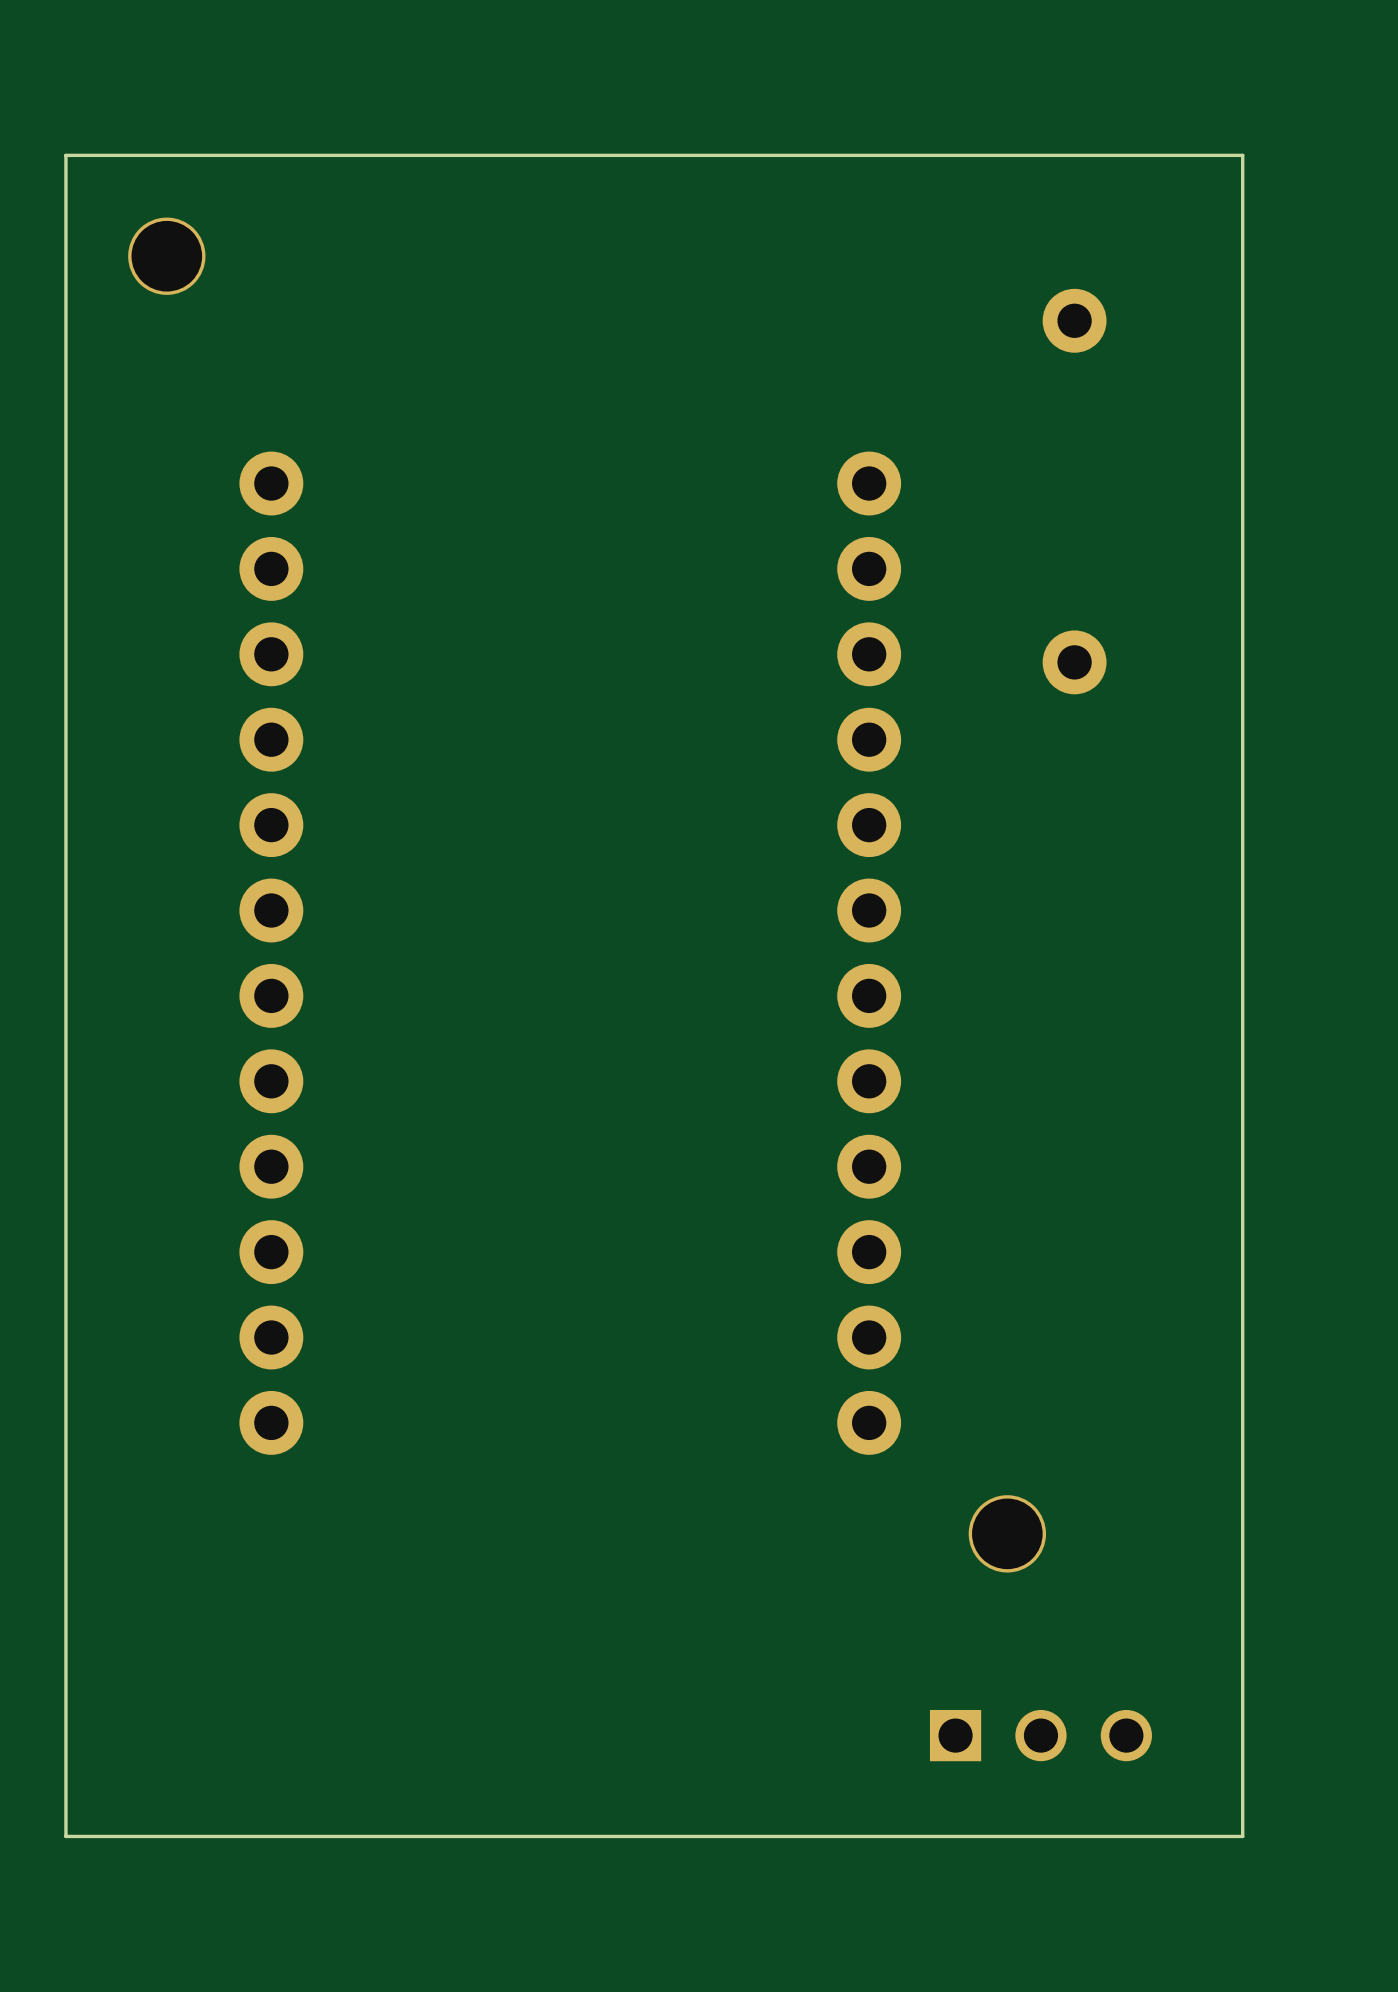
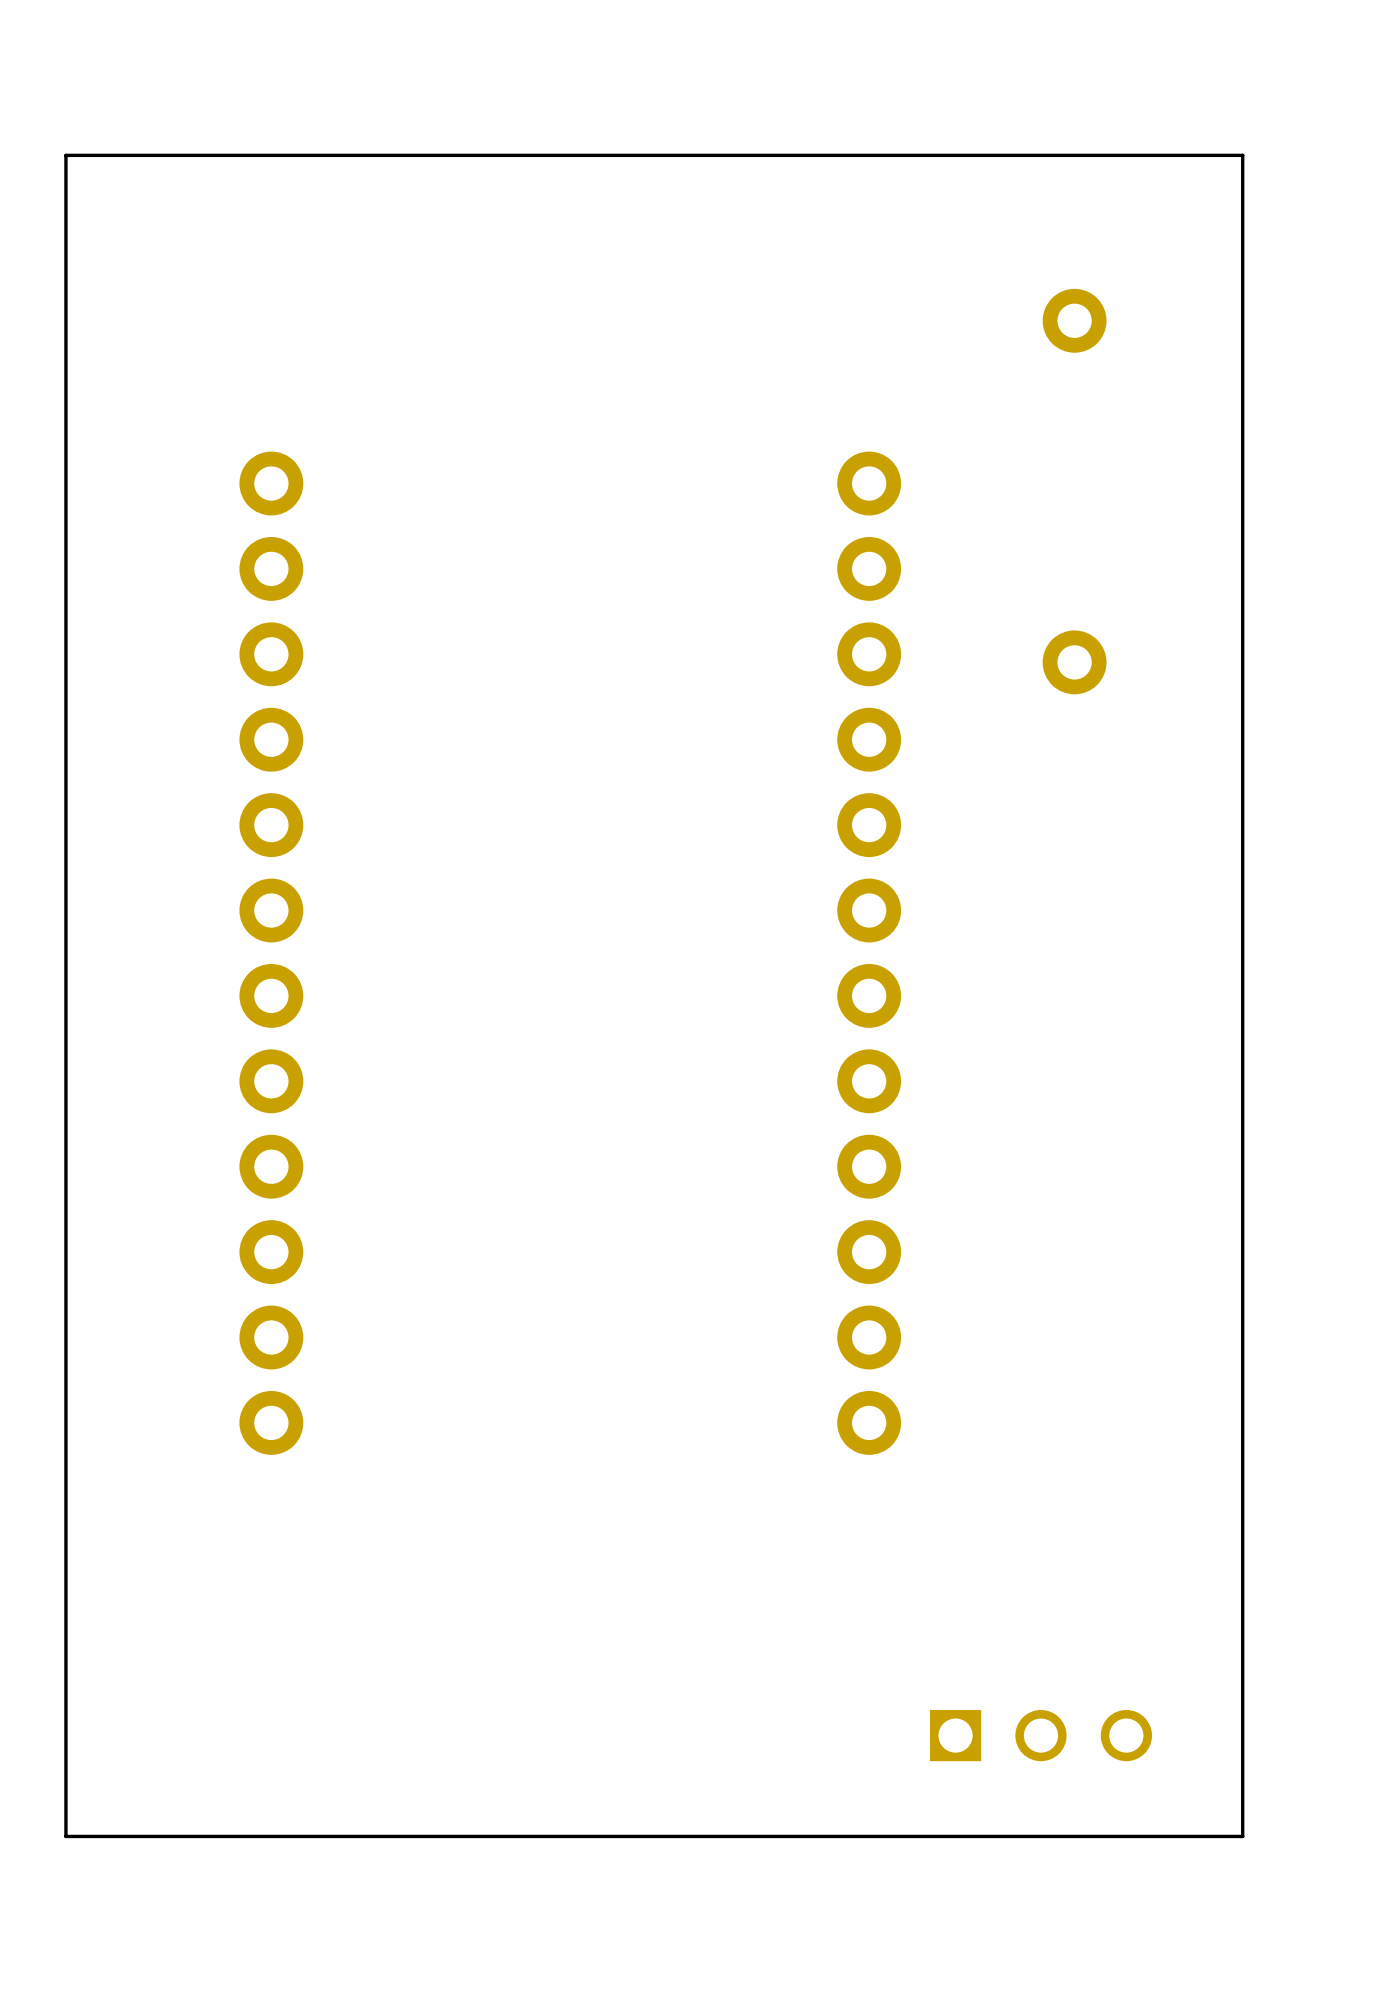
part: (166, 256) -> none
part: (1007, 1533) -> none

